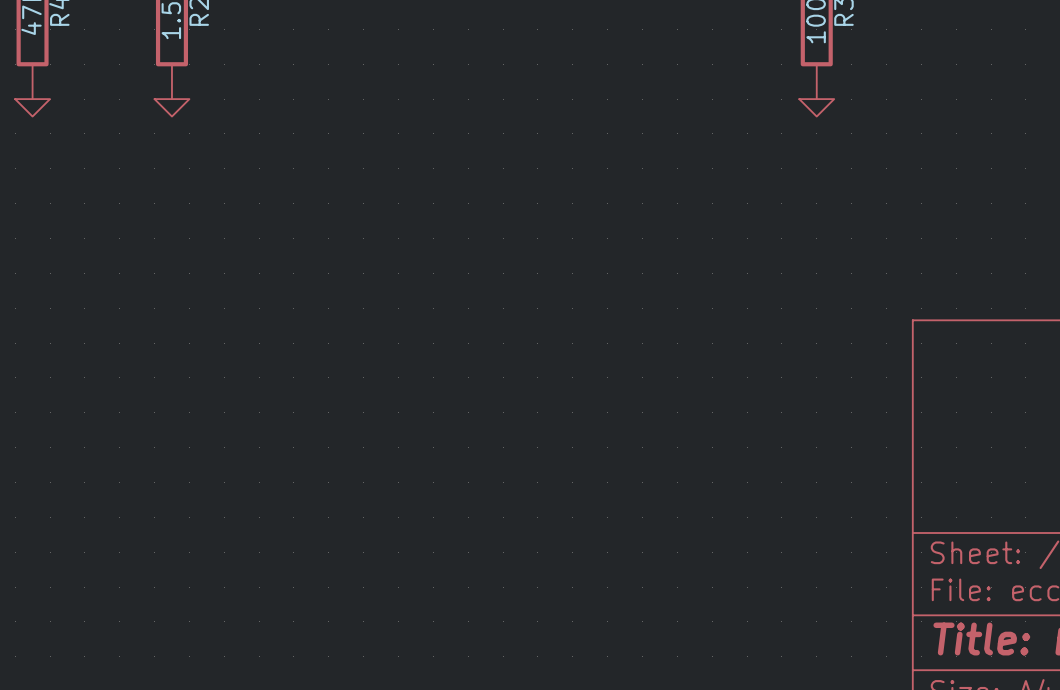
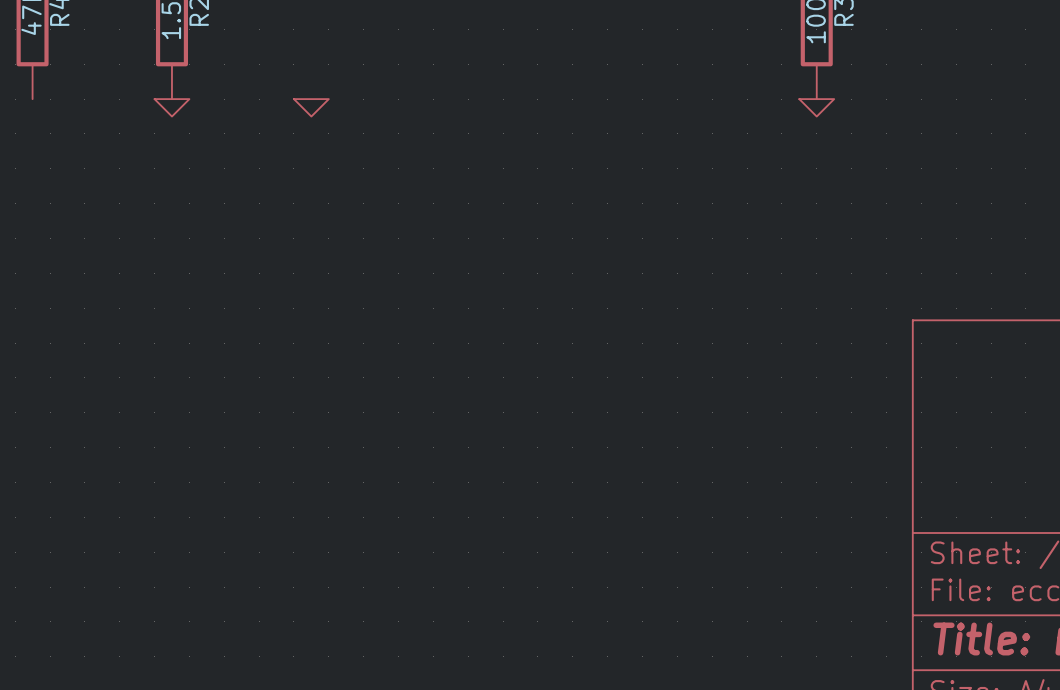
power symbol position: (32, 107) -> (311, 107)

